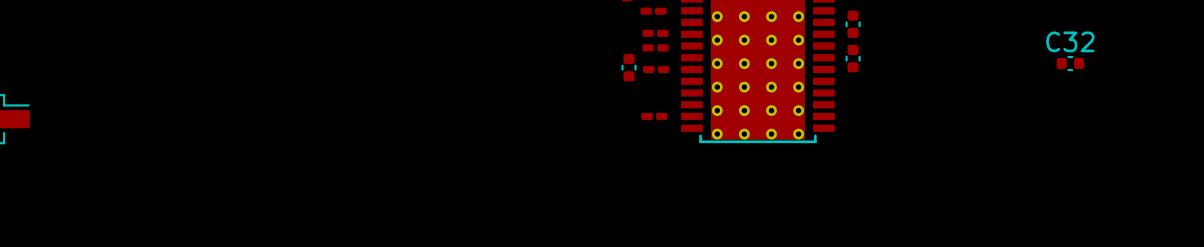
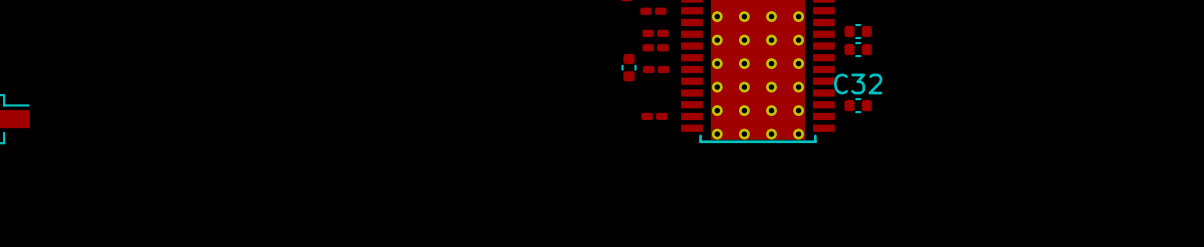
part rotation: 0° (853, 24) -> 90° clockwise (858, 31)
part rotation: 0° (853, 58) -> 90° clockwise (858, 49)
C32 position: (1070, 63) -> (858, 105)

